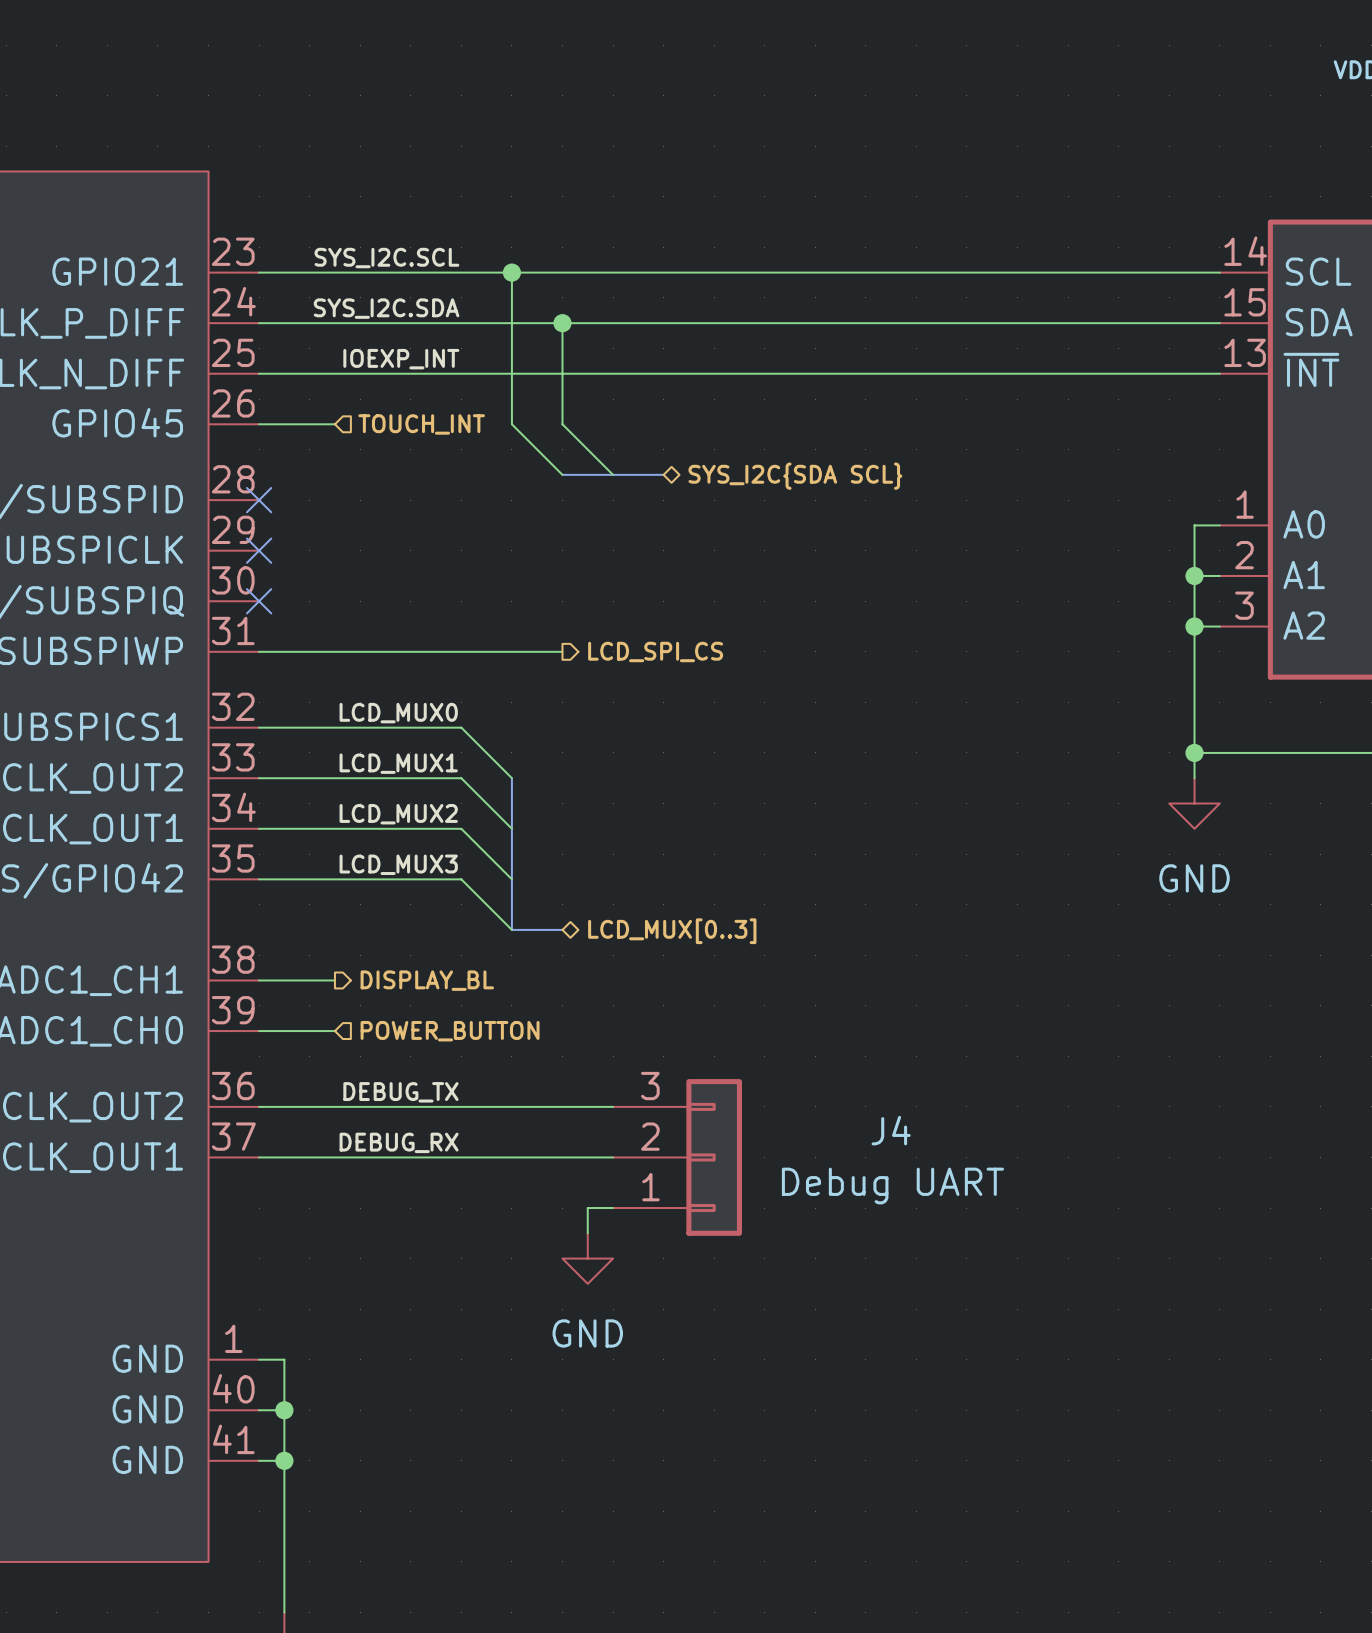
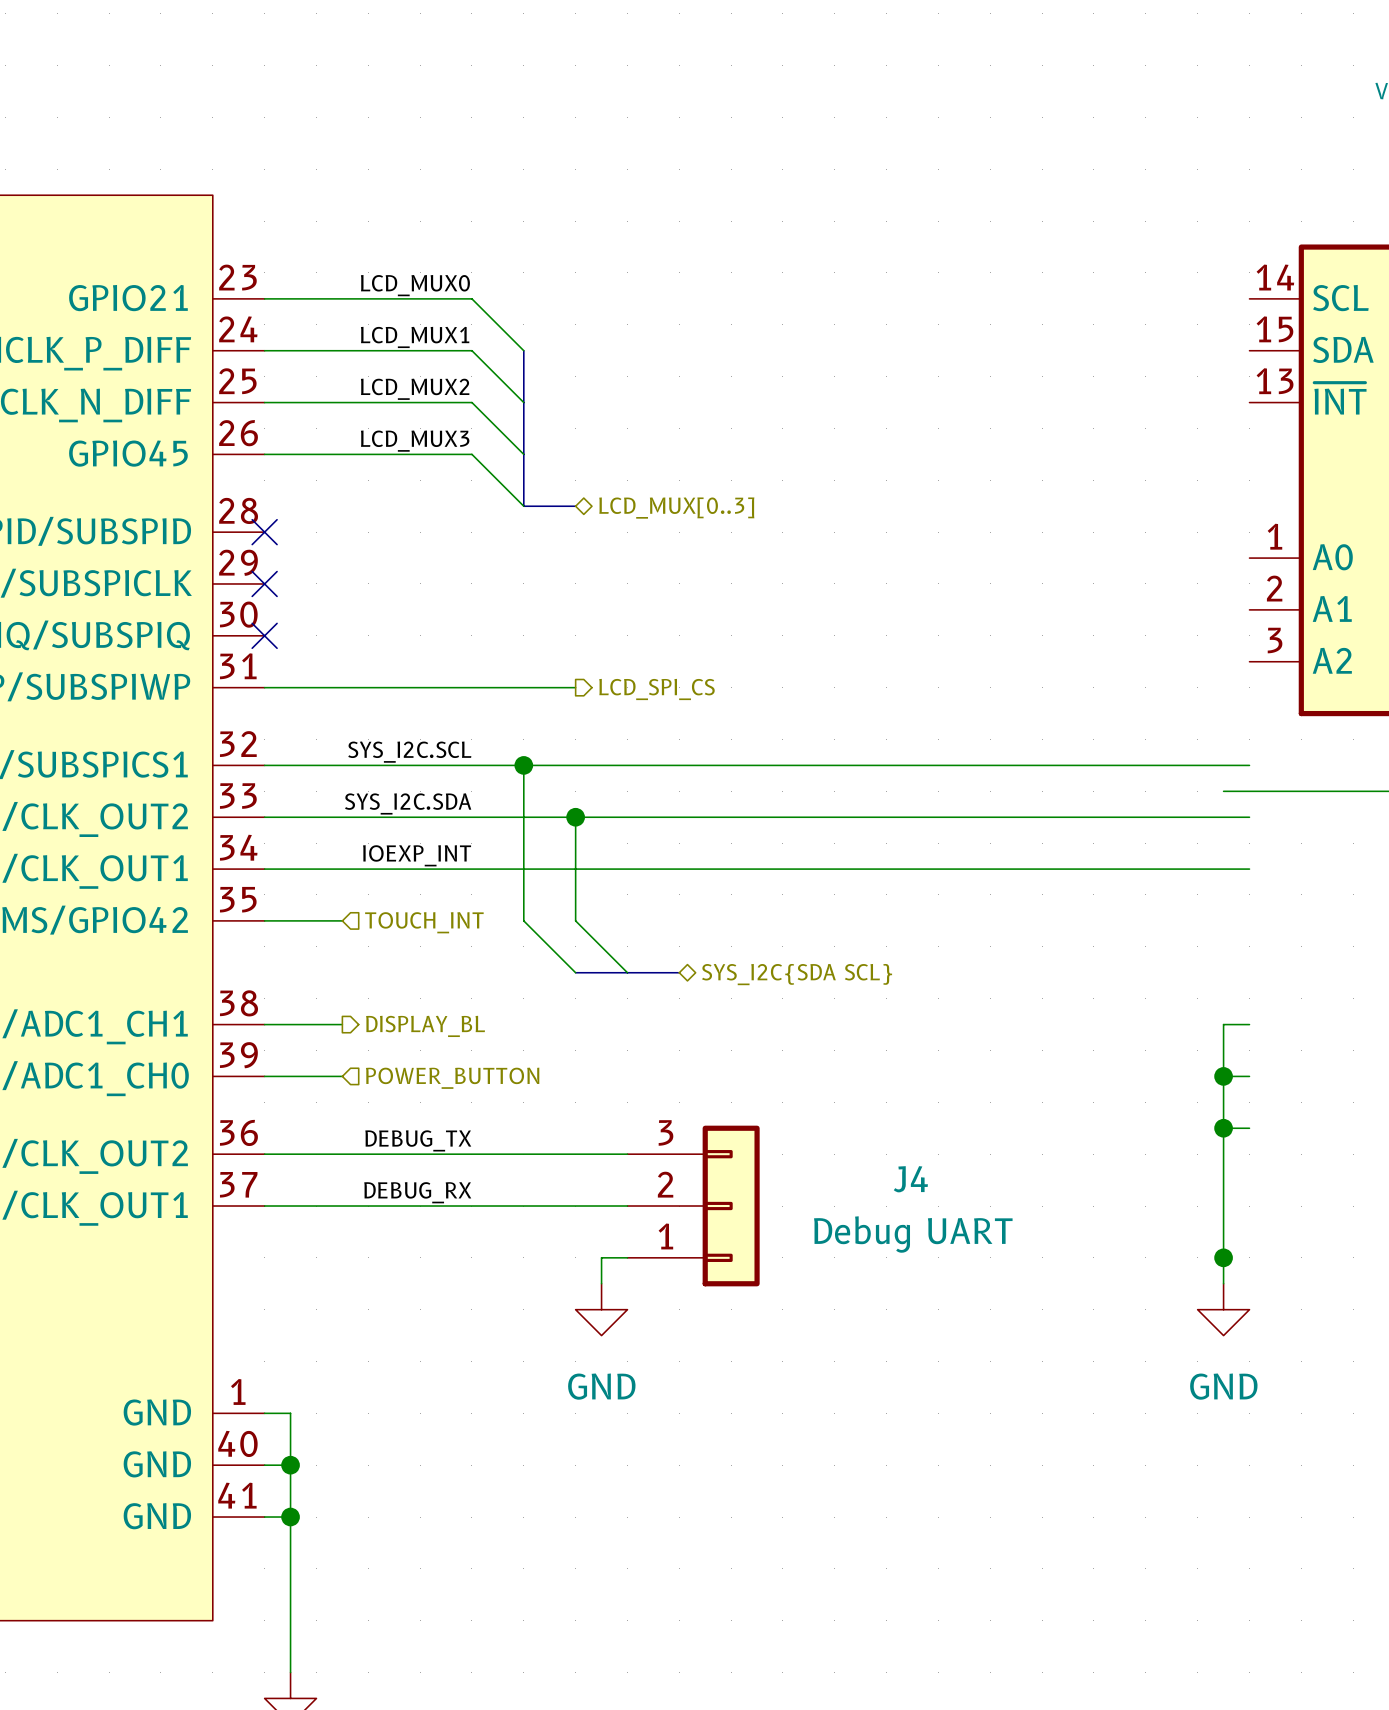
label: SYS_I2C.SCL (386, 258) -> LCD_MUX0 (415, 285)
wire: (461, 272) (1219, 272) -> (471, 298) (523, 350)
wire: (511, 272) (511, 424) (562, 474) -> (523, 765) (523, 920) (575, 972)
junction: (511, 272) -> none
label: SYS_I2C.SDA (386, 308) -> LCD_MUX1 (415, 337)
wire: (461, 323) (1219, 323) -> (471, 350) (523, 402)
wire: (562, 323) (562, 424) (613, 474) -> (575, 817) (575, 920) (627, 972)
junction: (562, 323) -> none
label: IOEXP_INT (401, 359) -> LCD_MUX2 (415, 389)
wire: (461, 373) (1219, 373) -> (471, 402) (523, 454)
hierarchical label position: TOUCH_INT (421, 424) -> TOUCH_INT (424, 922)
bus: (562, 474) (663, 474) -> (575, 506) (523, 506) (523, 350)
hierarchical label position: SYS_I2C{SDA SCL} (795, 476) -> SYS_I2C{SDA SCL} (797, 974)
wire: (1219, 525) (1194, 525) (1194, 778) -> (1249, 1024) (1223, 1024) (1223, 1283)
wire: (1194, 575) (1219, 575) -> (1223, 1076) (1249, 1076)
junction: (1194, 575) -> none
wire: (1194, 626) (1219, 626) -> (1223, 1128) (1249, 1128)
junction: (1194, 626) -> none
label: LCD_MUX0 (398, 713) -> SYS_I2C.SCL (409, 752)
wire: (461, 727) (511, 778) -> (471, 765) (1249, 765)
junction: none -> (523, 765)
junction: (1194, 752) -> none
label: LCD_MUX1 (398, 763) -> SYS_I2C.SDA (408, 803)
wire: (461, 778) (511, 828) -> (471, 817) (1249, 817)
bus: (511, 778) (511, 929) (562, 929) -> (679, 972) (575, 972)
junction: none -> (575, 817)
power symbol position: GND (1194, 803) -> GND (1223, 1309)
label: LCD_MUX2 (398, 814) -> IOEXP_INT (417, 855)
wire: (461, 828) (511, 879) -> (471, 869) (1249, 869)
label position: LCD_MUX3 (398, 864) -> LCD_MUX3 (415, 441)
wire: (334, 879) (461, 879) (511, 929) -> (342, 454) (471, 454) (523, 506)
hierarchical label position: LCD_MUX[0..3] (672, 931) -> LCD_MUX[0..3] (676, 508)
junction: none -> (1223, 1076)
junction: none -> (1223, 1128)
junction: none -> (1223, 1257)

